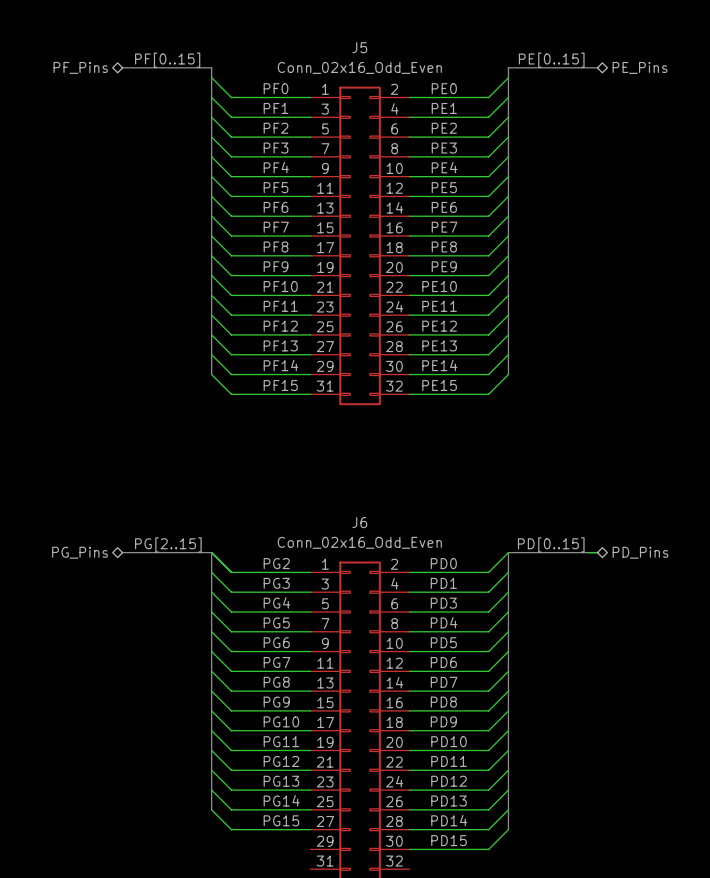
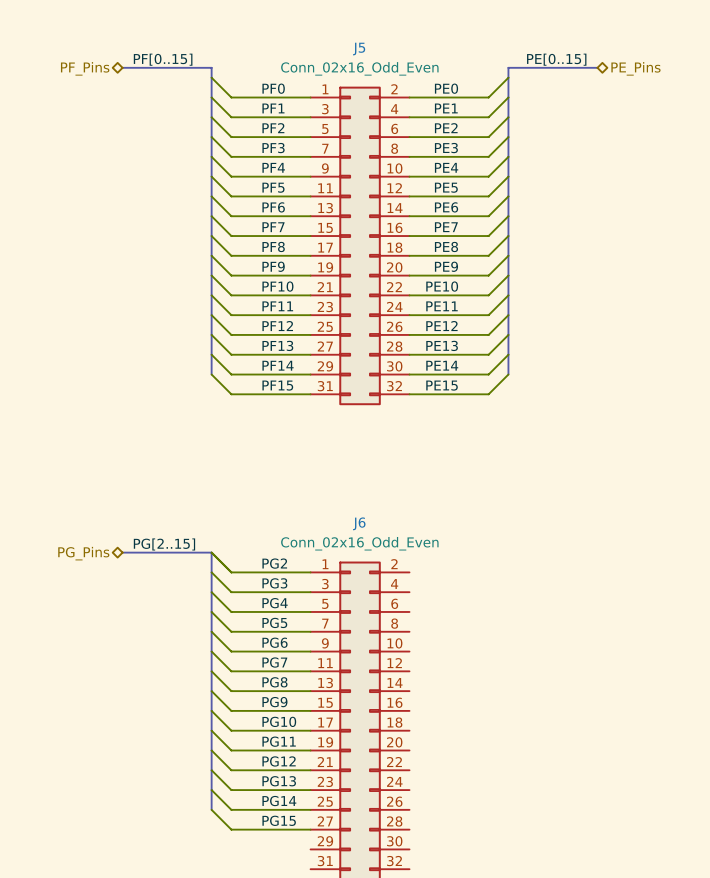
label: PD[0..15] (551, 544) -> none
wire: (508, 552) (488, 572) (409, 572) -> none
wire: (587, 552) (597, 552) -> none
bus: (597, 552) (508, 552) (508, 829) -> none
hierarchical label: PD_Pins (640, 552) -> none
label: PD0 (443, 563) -> none
wire: (508, 572) (488, 592) (409, 592) -> none
label: PD1 (443, 583) -> none
wire: (508, 592) (488, 611) (409, 611) -> none
label: PD3 (443, 603) -> none
wire: (508, 611) (488, 631) (409, 631) -> none
label: PD4 (444, 622) -> none
wire: (508, 631) (488, 651) (409, 651) -> none
label: PD5 (443, 642) -> none
wire: (508, 651) (488, 671) (409, 671) -> none
label: PD6 (443, 662) -> none
wire: (508, 671) (488, 691) (409, 691) -> none
label: PD7 (444, 682) -> none
wire: (508, 691) (488, 710) (409, 710) -> none
label: PD8 (443, 702) -> none
wire: (508, 710) (488, 730) (409, 730) -> none
label: PD9 (443, 721) -> none
wire: (508, 730) (488, 750) (409, 750) -> none
label: PD10 (449, 741) -> none
wire: (508, 750) (488, 770) (409, 770) -> none
label: PD11 (449, 761) -> none
wire: (508, 770) (488, 790) (409, 790) -> none
label: PD12 (449, 781) -> none
wire: (508, 790) (488, 809) (409, 809) -> none
label: PD13 (449, 801) -> none
wire: (508, 809) (488, 829) (409, 829) -> none
label: PD14 (449, 820) -> none
wire: (508, 829) (488, 849) (409, 849) -> none
label: PD15 (449, 840) -> none

